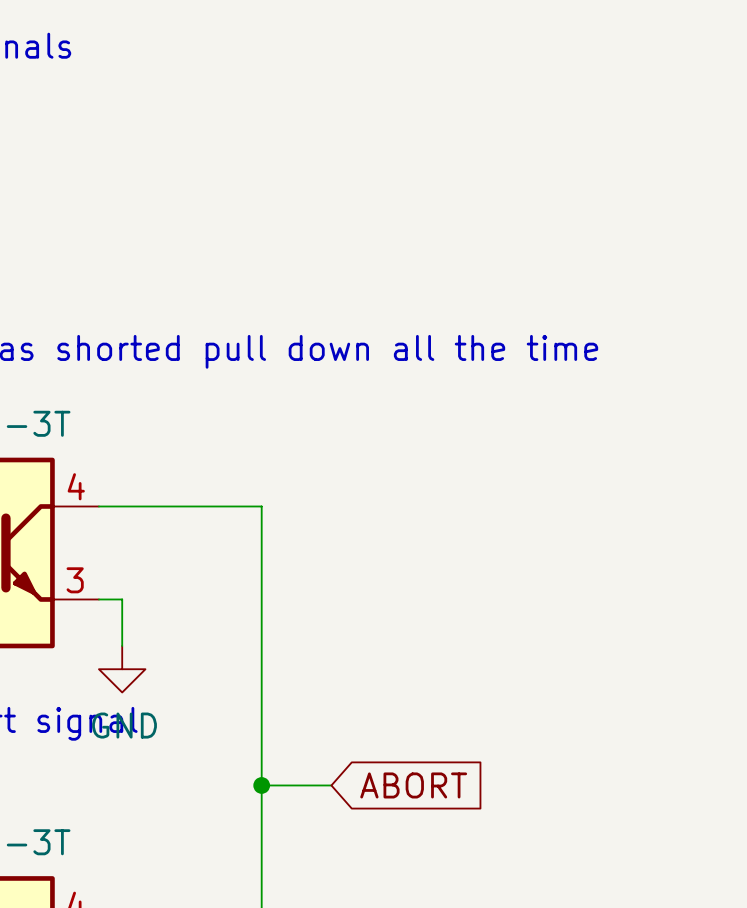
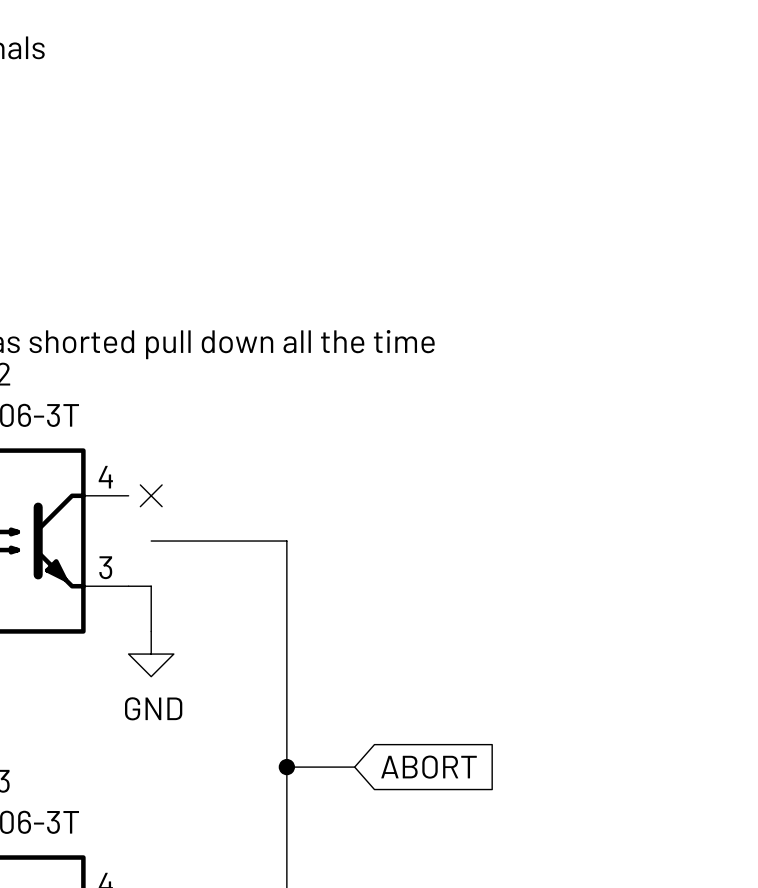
wire: (98, 506) (261, 506) (261, 552) -> (151, 541) (286, 541)
no-connect mark: none -> (151, 495)

